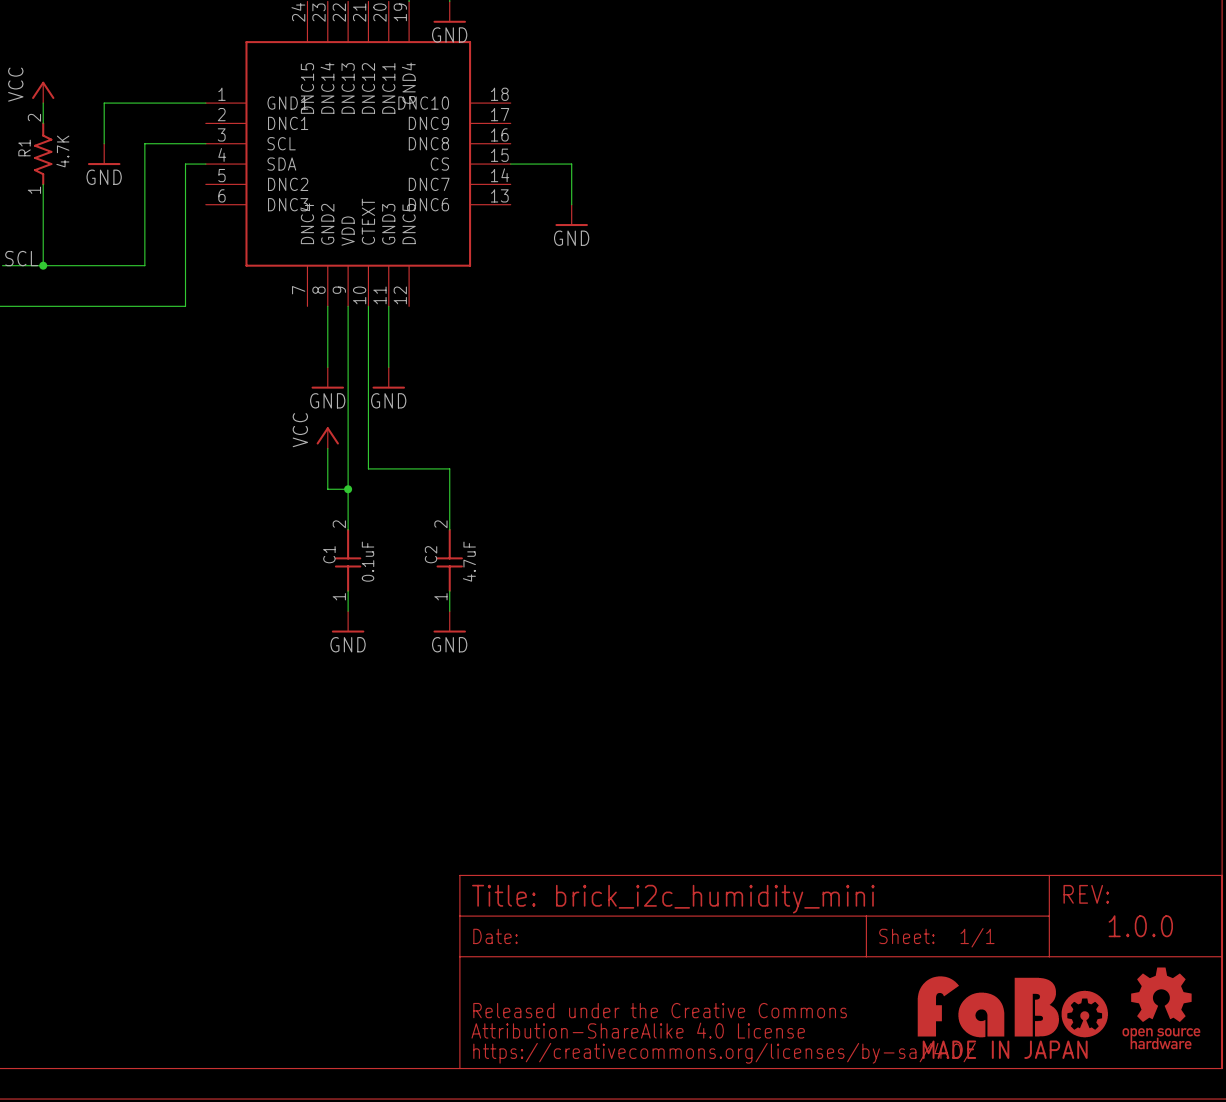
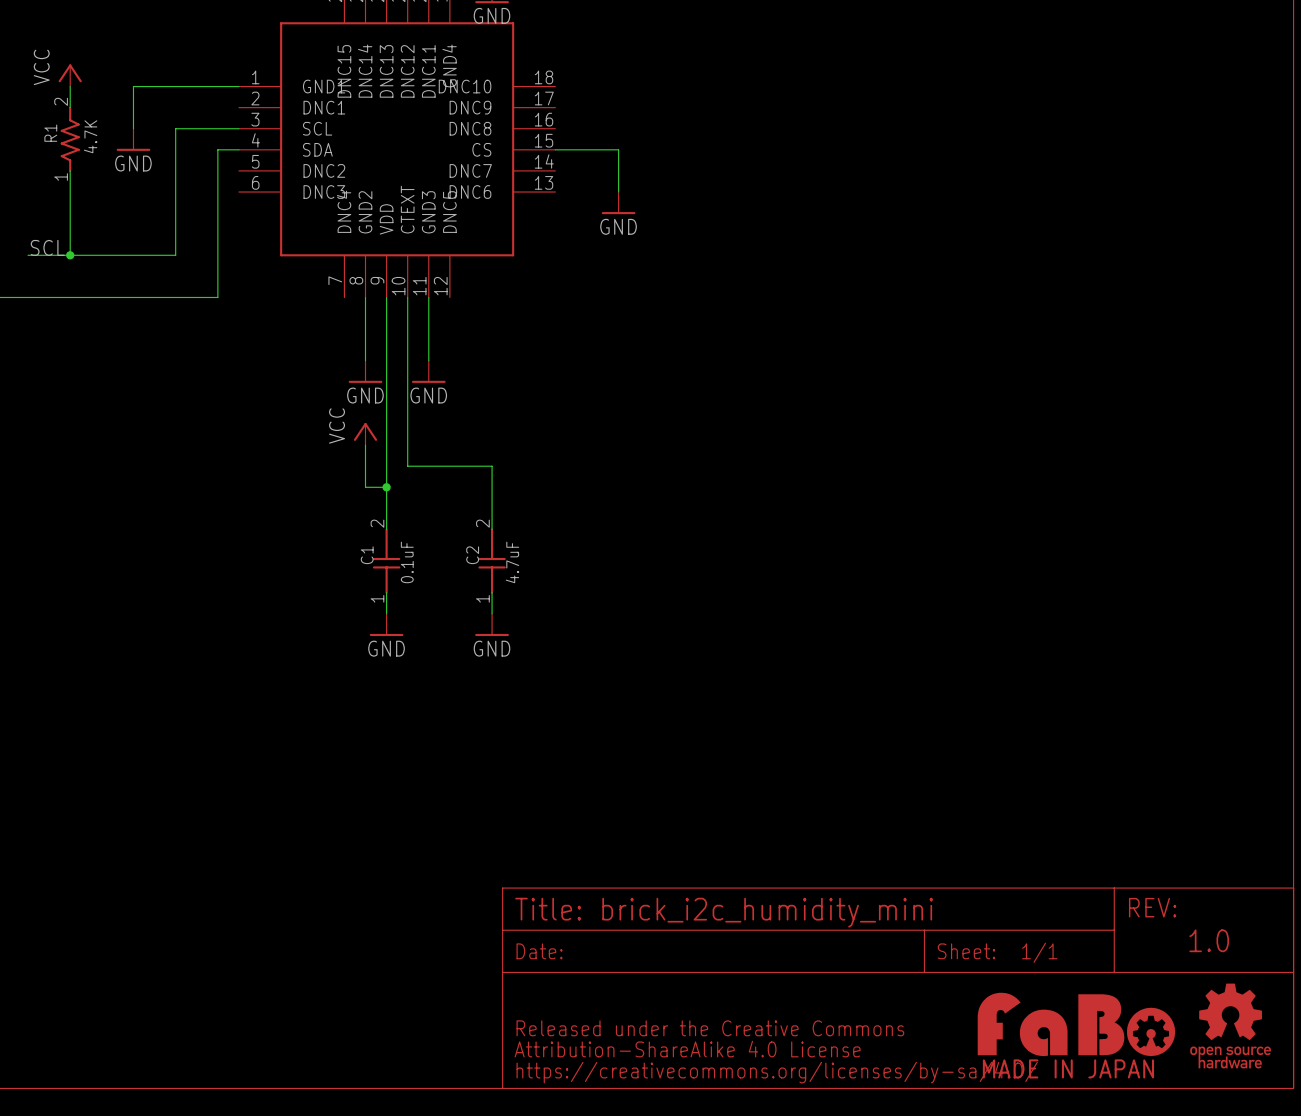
text: 1.0.0 (1140, 926) -> 1.0 (1209, 940)

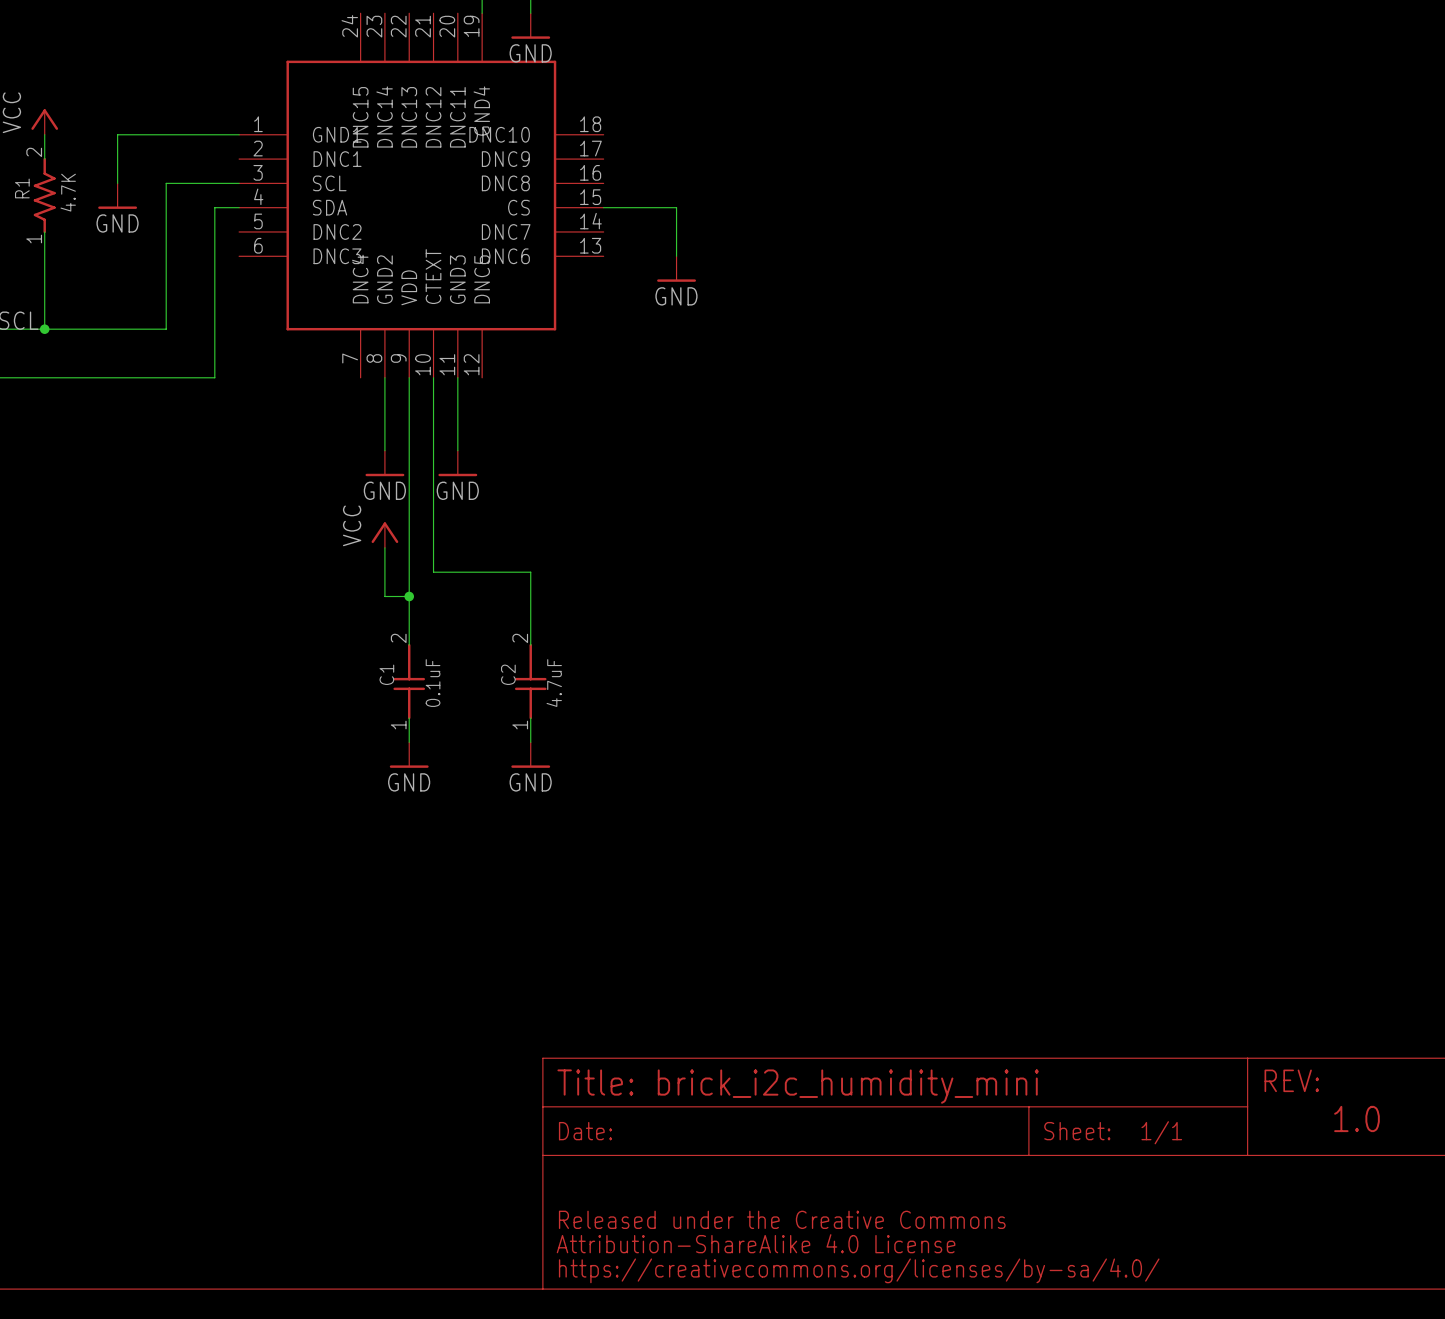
part: (1076, 1024) -> none
part: (1230, 1026) -> none

